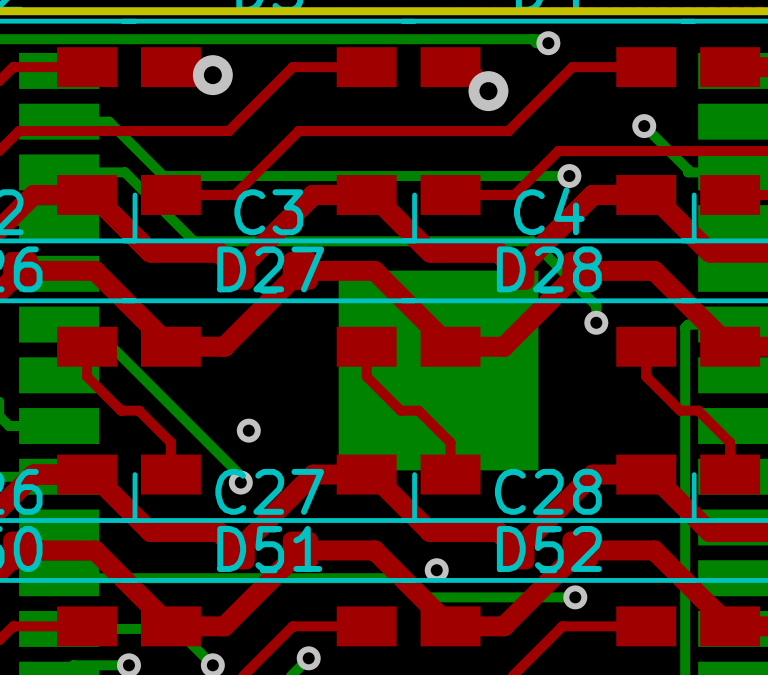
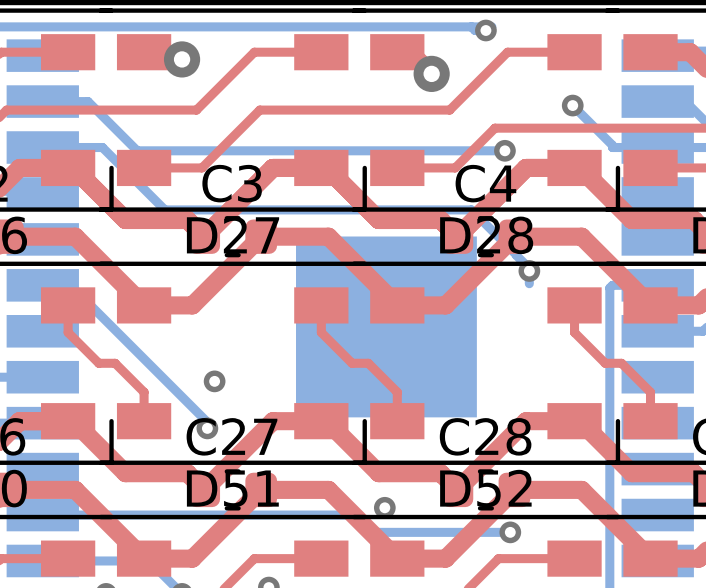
via position: (596, 322) -> (529, 270)

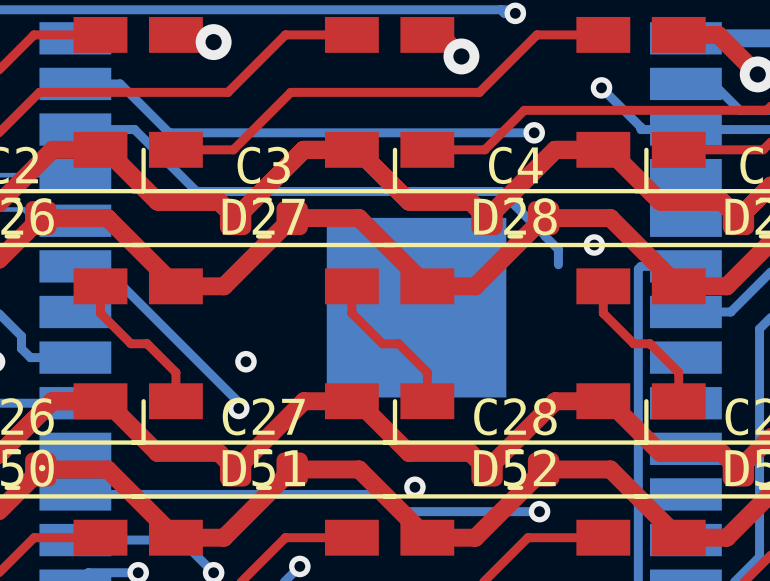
via position: (529, 270) -> (594, 245)

